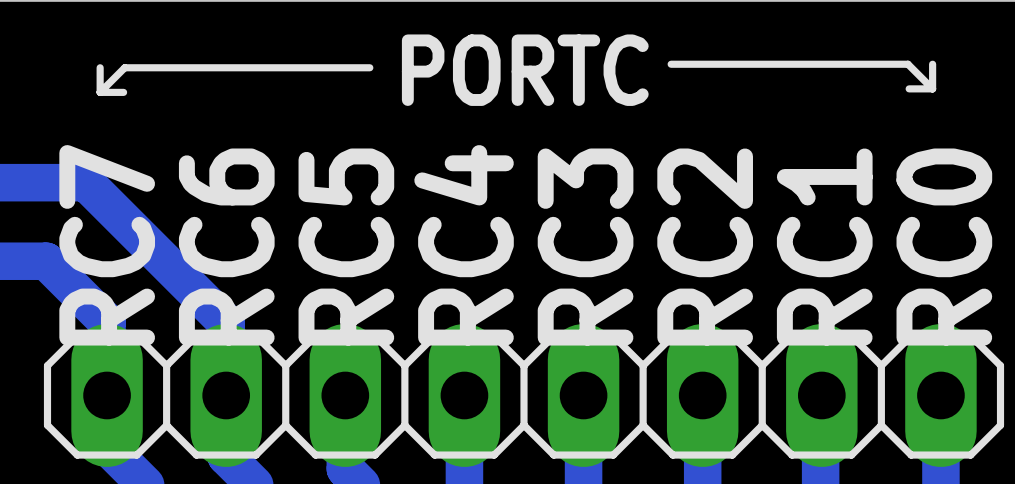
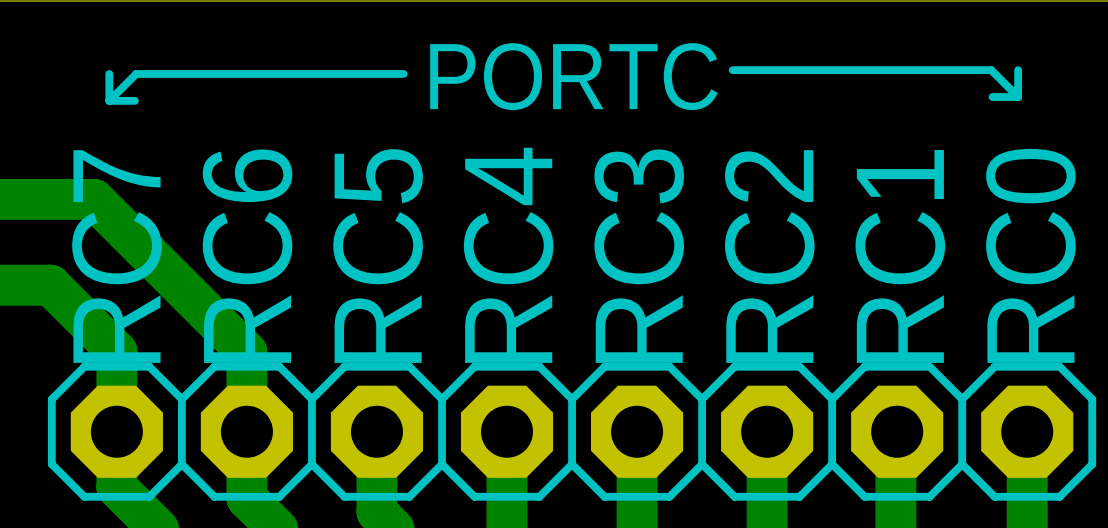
PORTC footprint: [43, 324, 1005, 467] -> [47, 362, 1097, 501]

